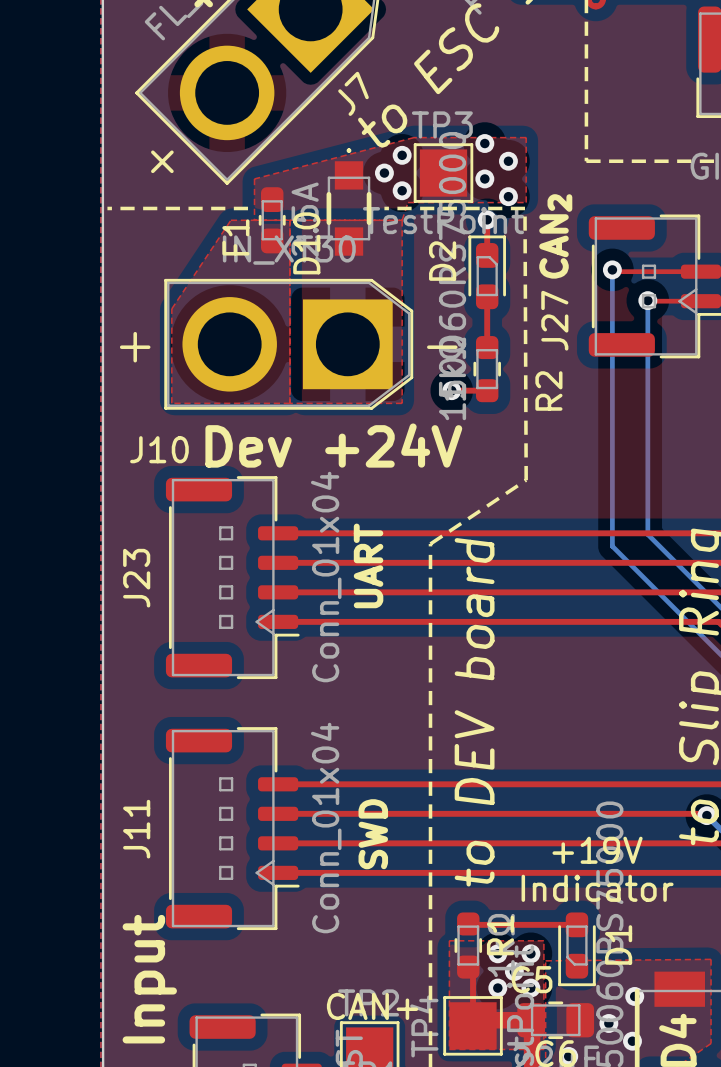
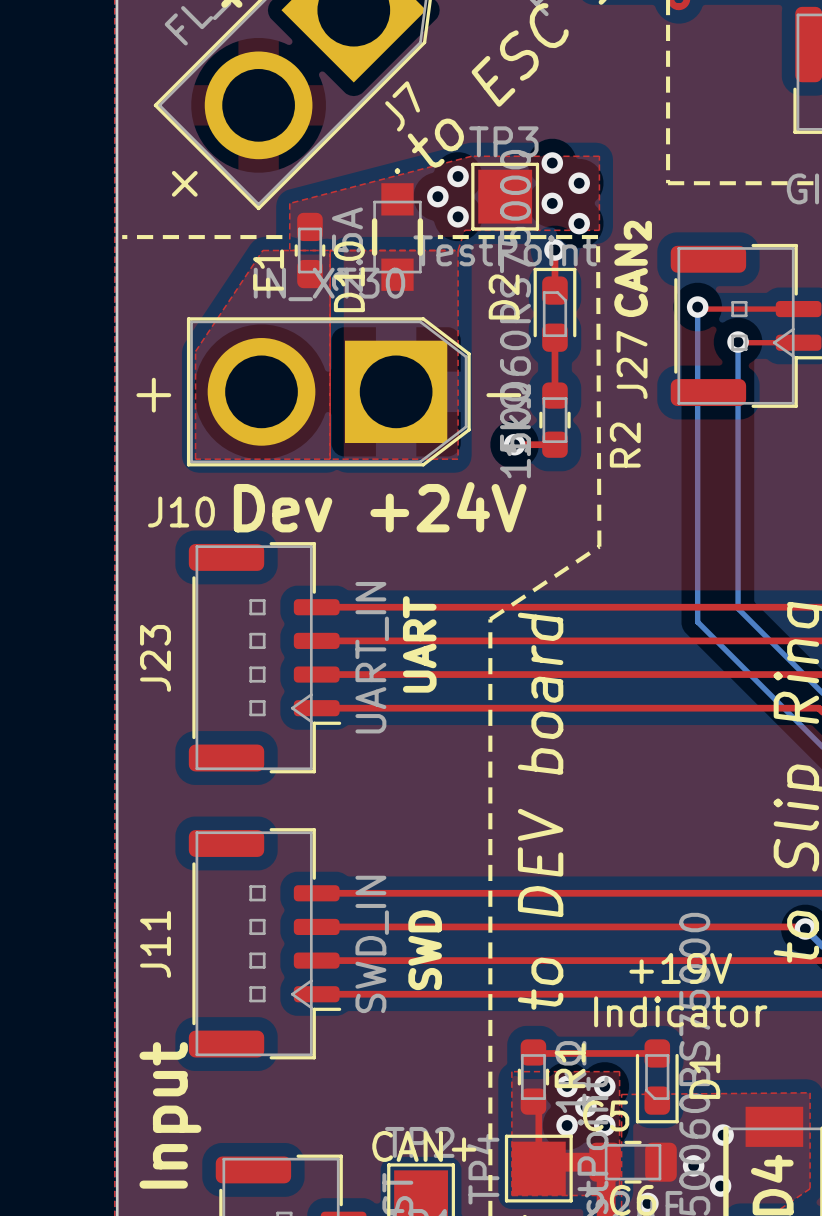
J23 value: Conn_01x04 (326, 577) -> UART_IN (372, 657)
J11 value: Conn_01x04 (326, 828) -> SWD_IN (372, 944)

